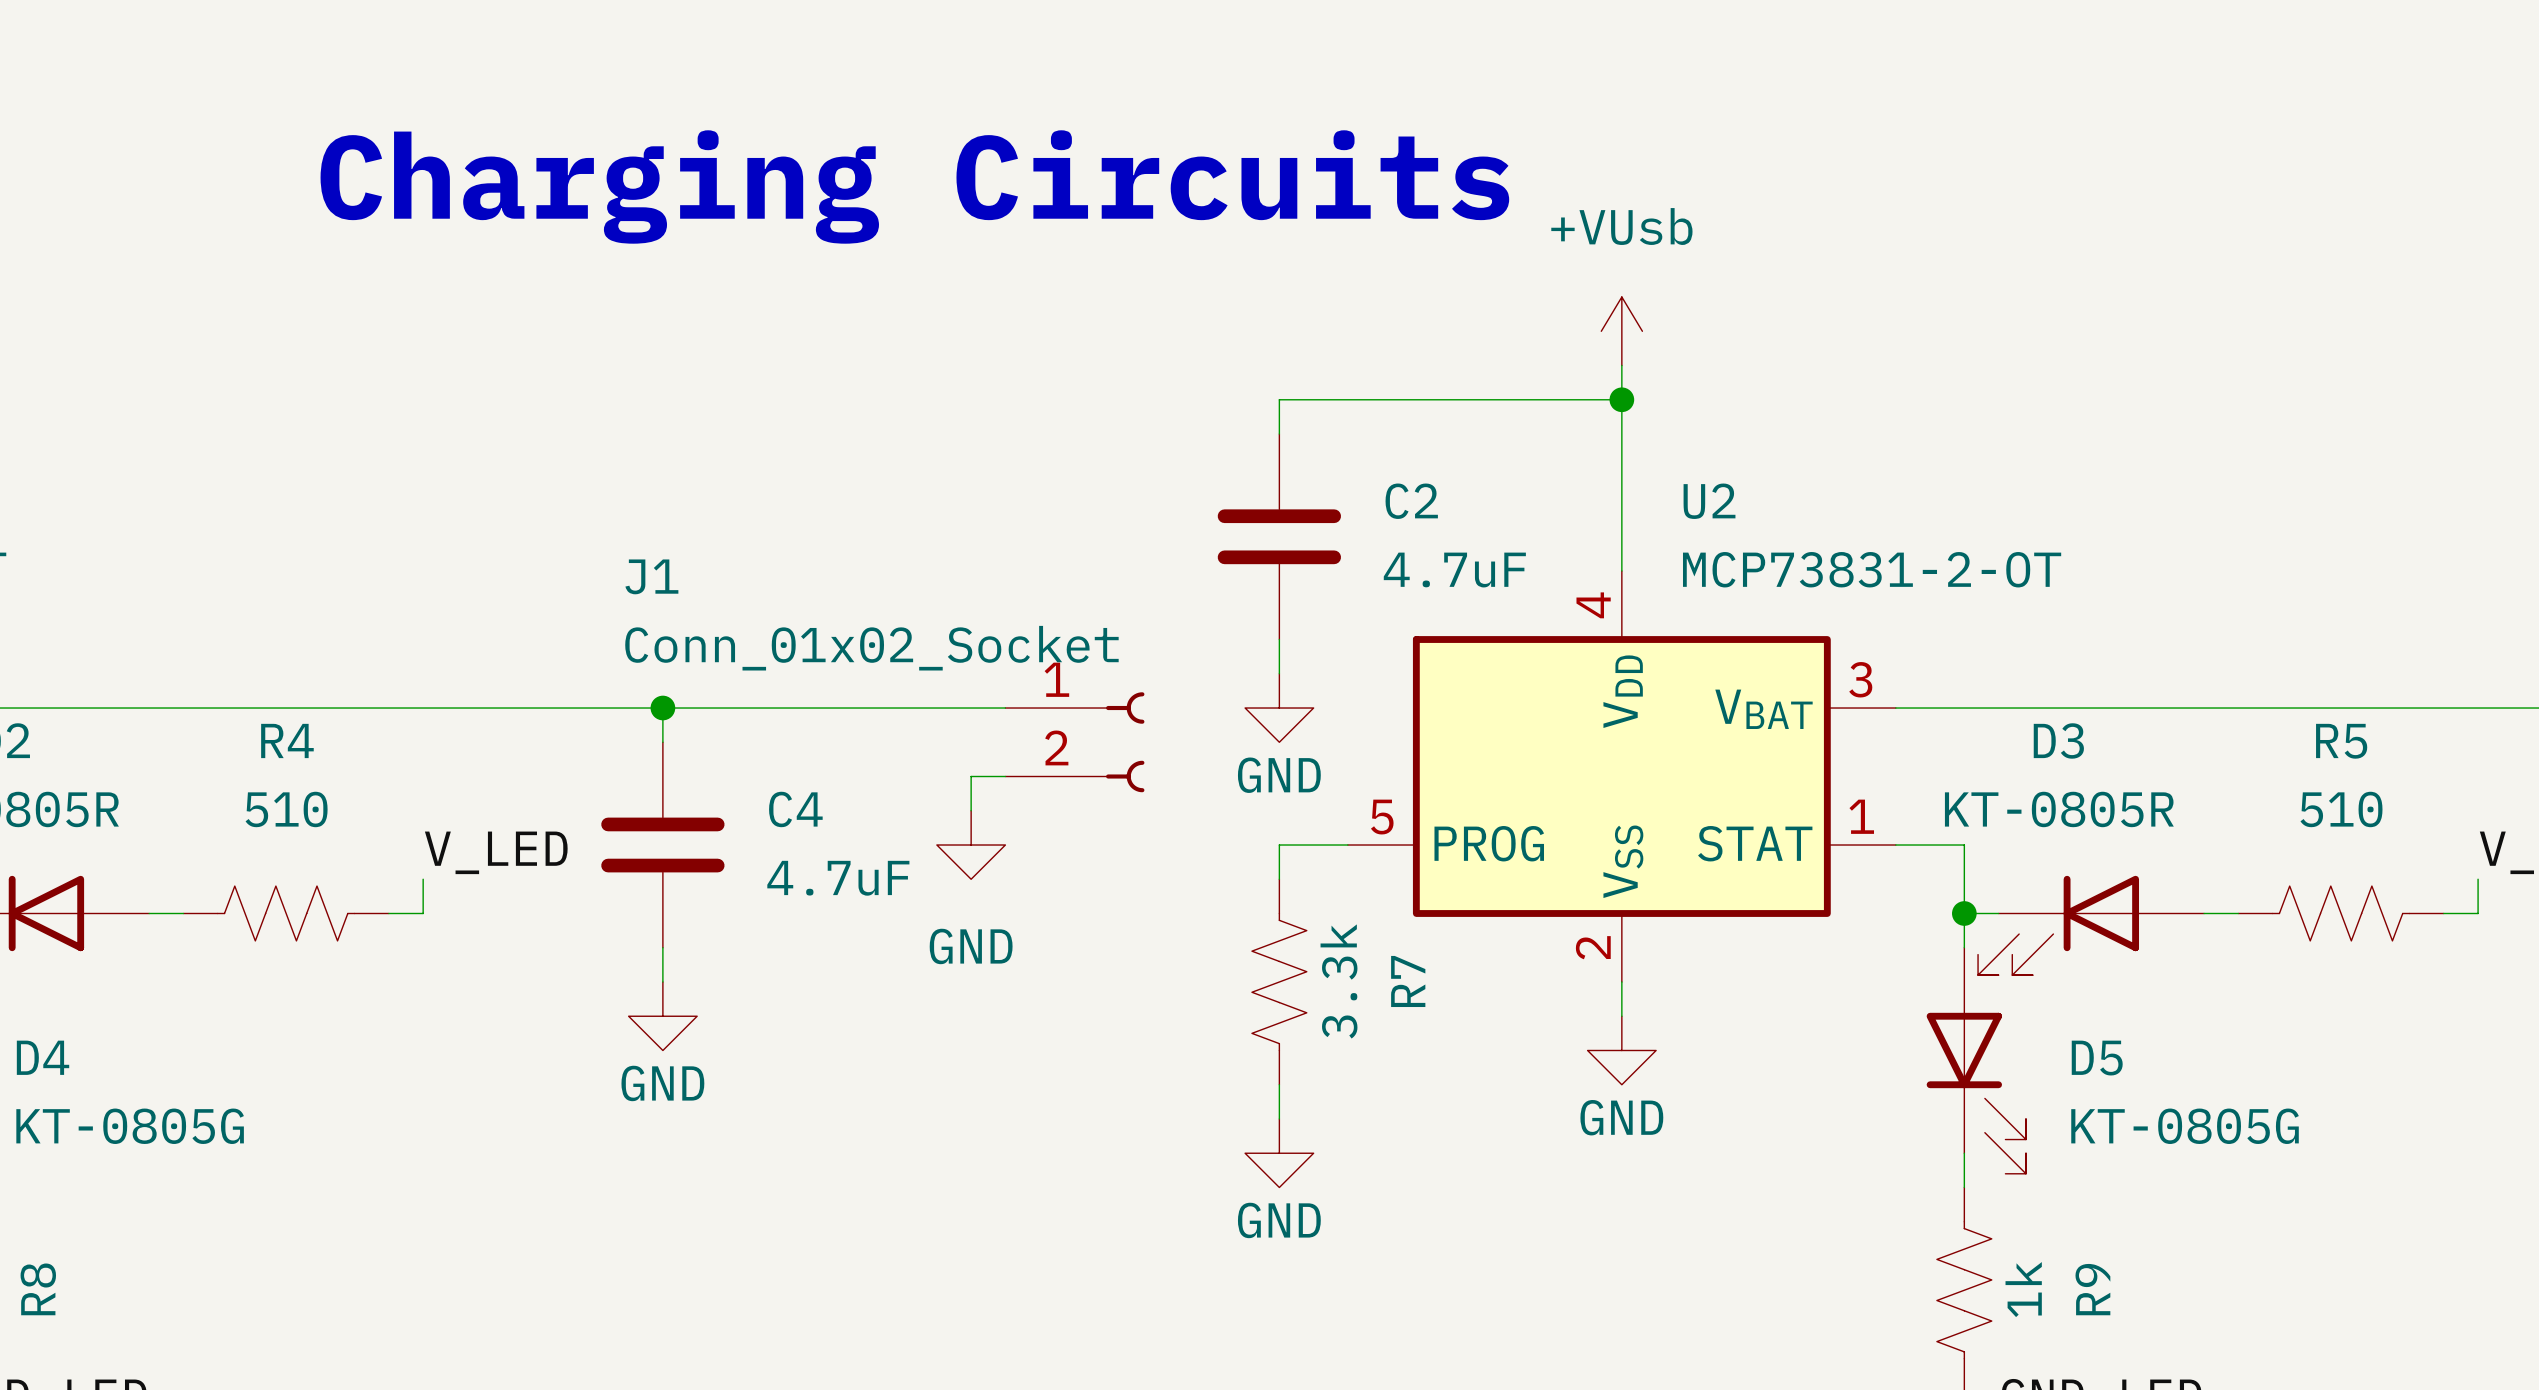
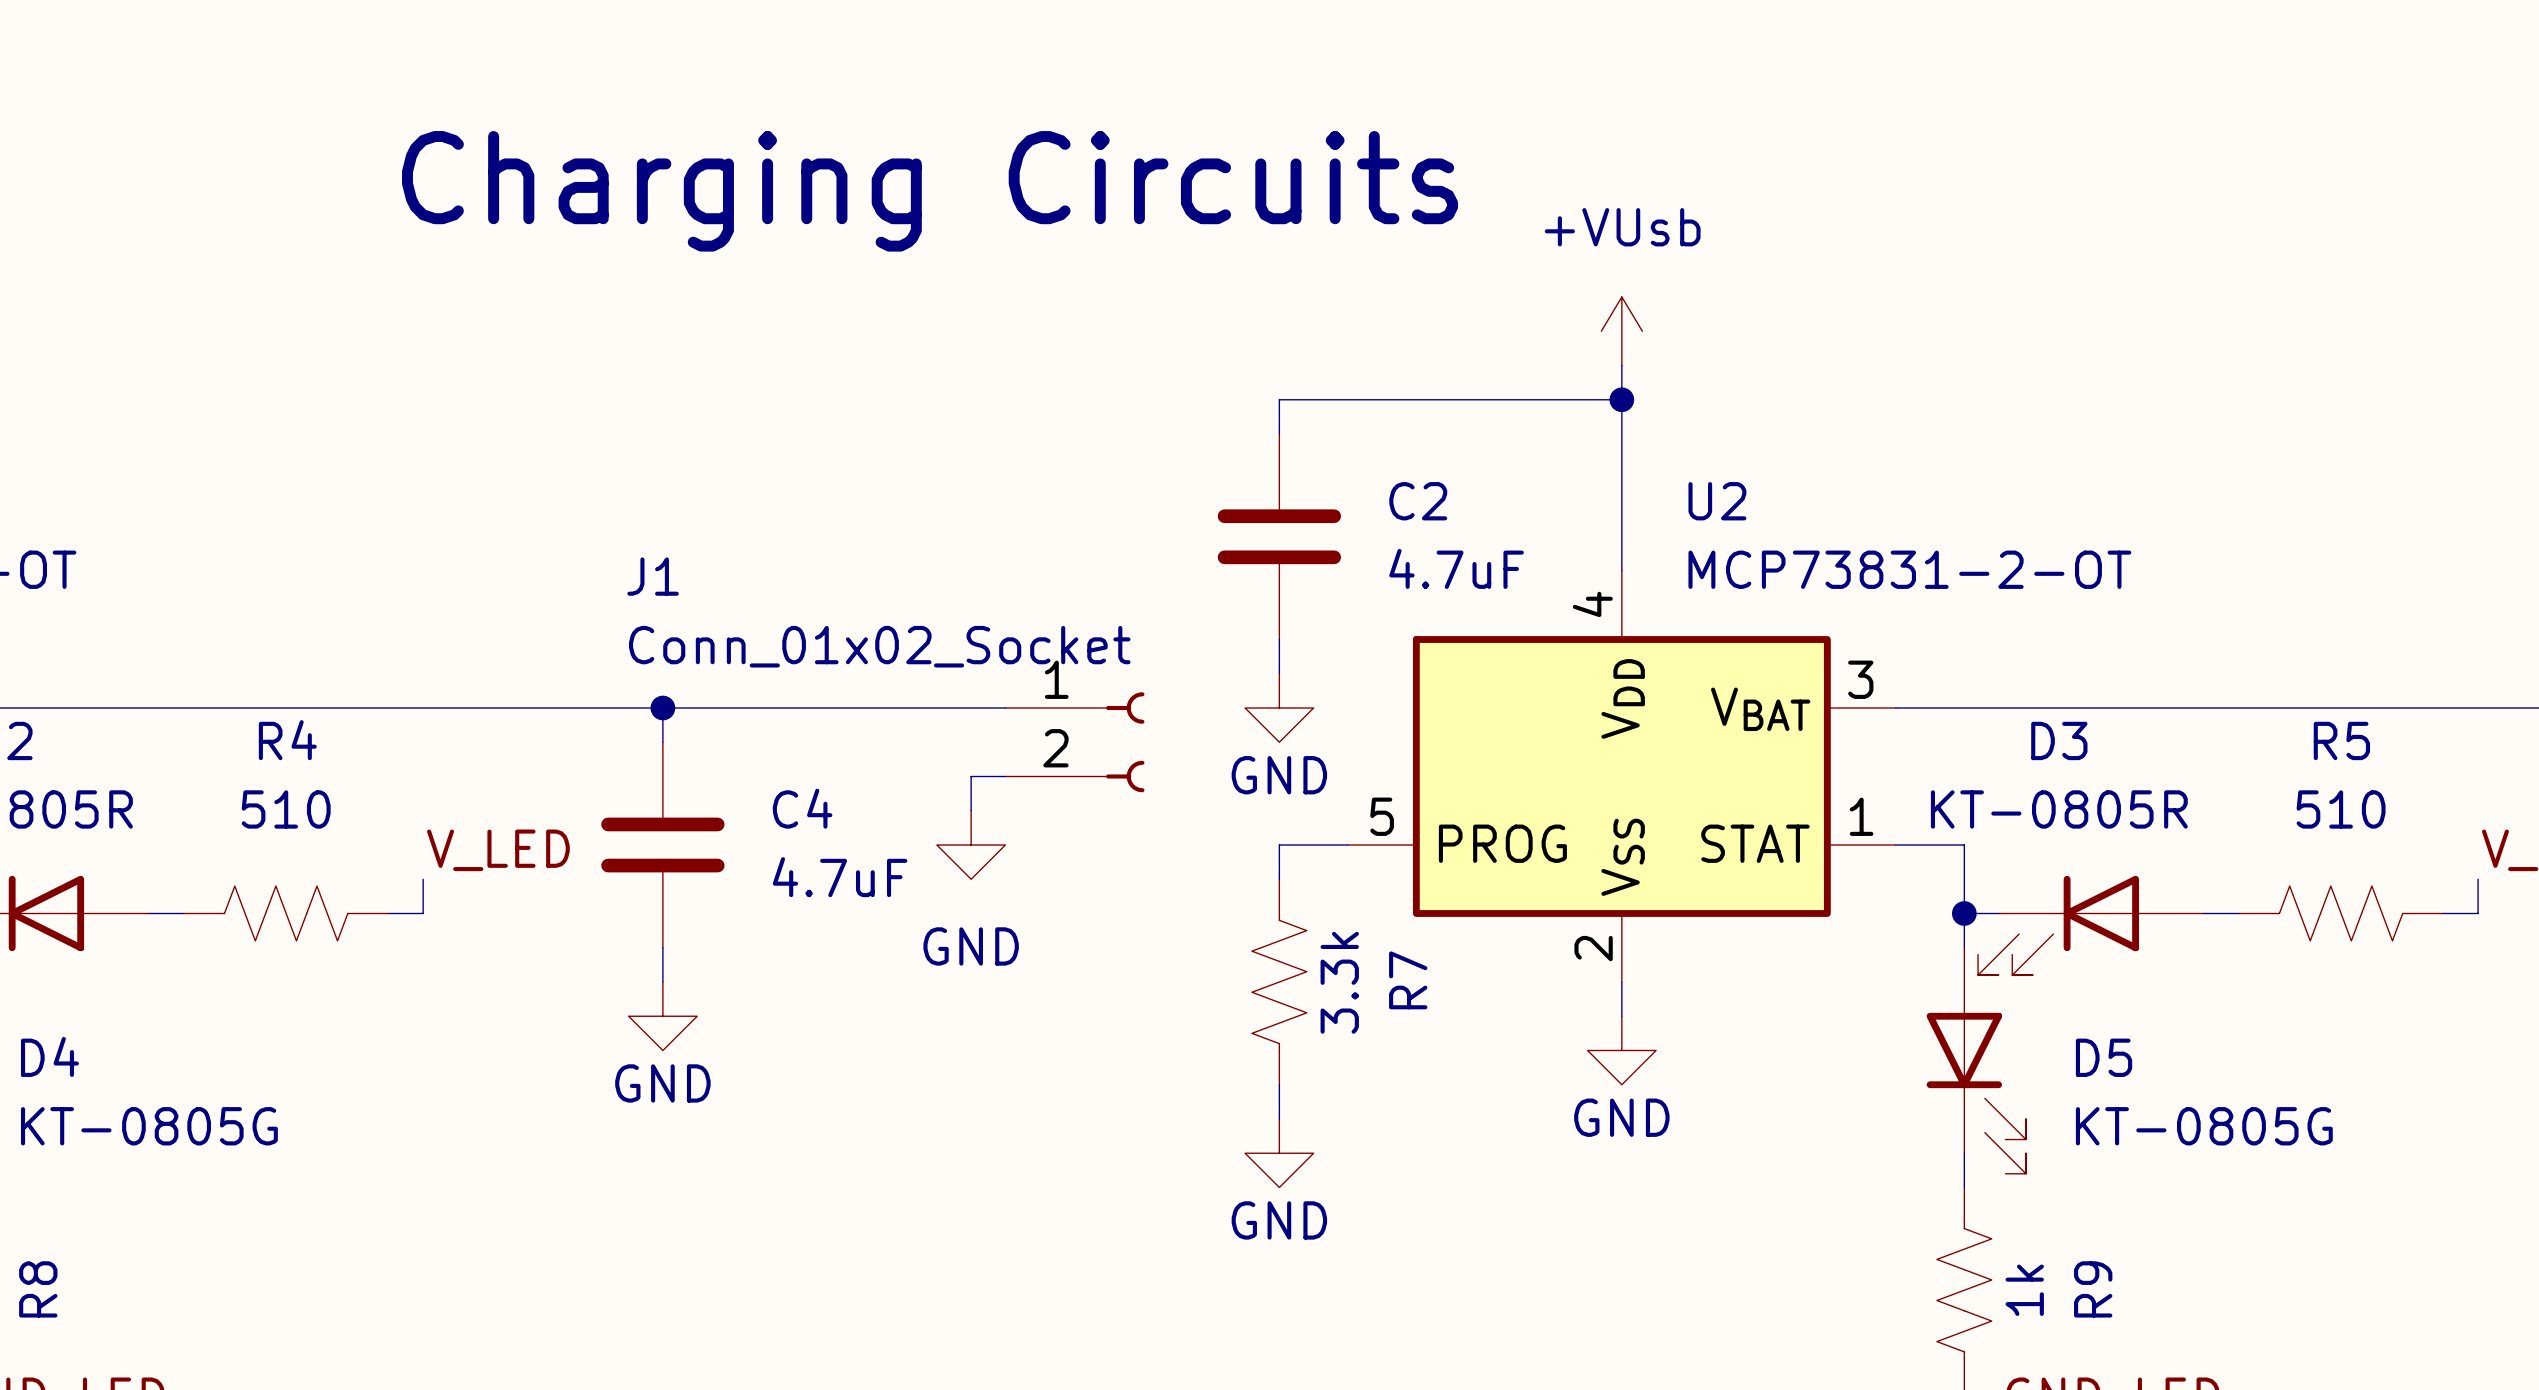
text position: Charging Circuits (914, 186) -> Charging Circuits (930, 191)

